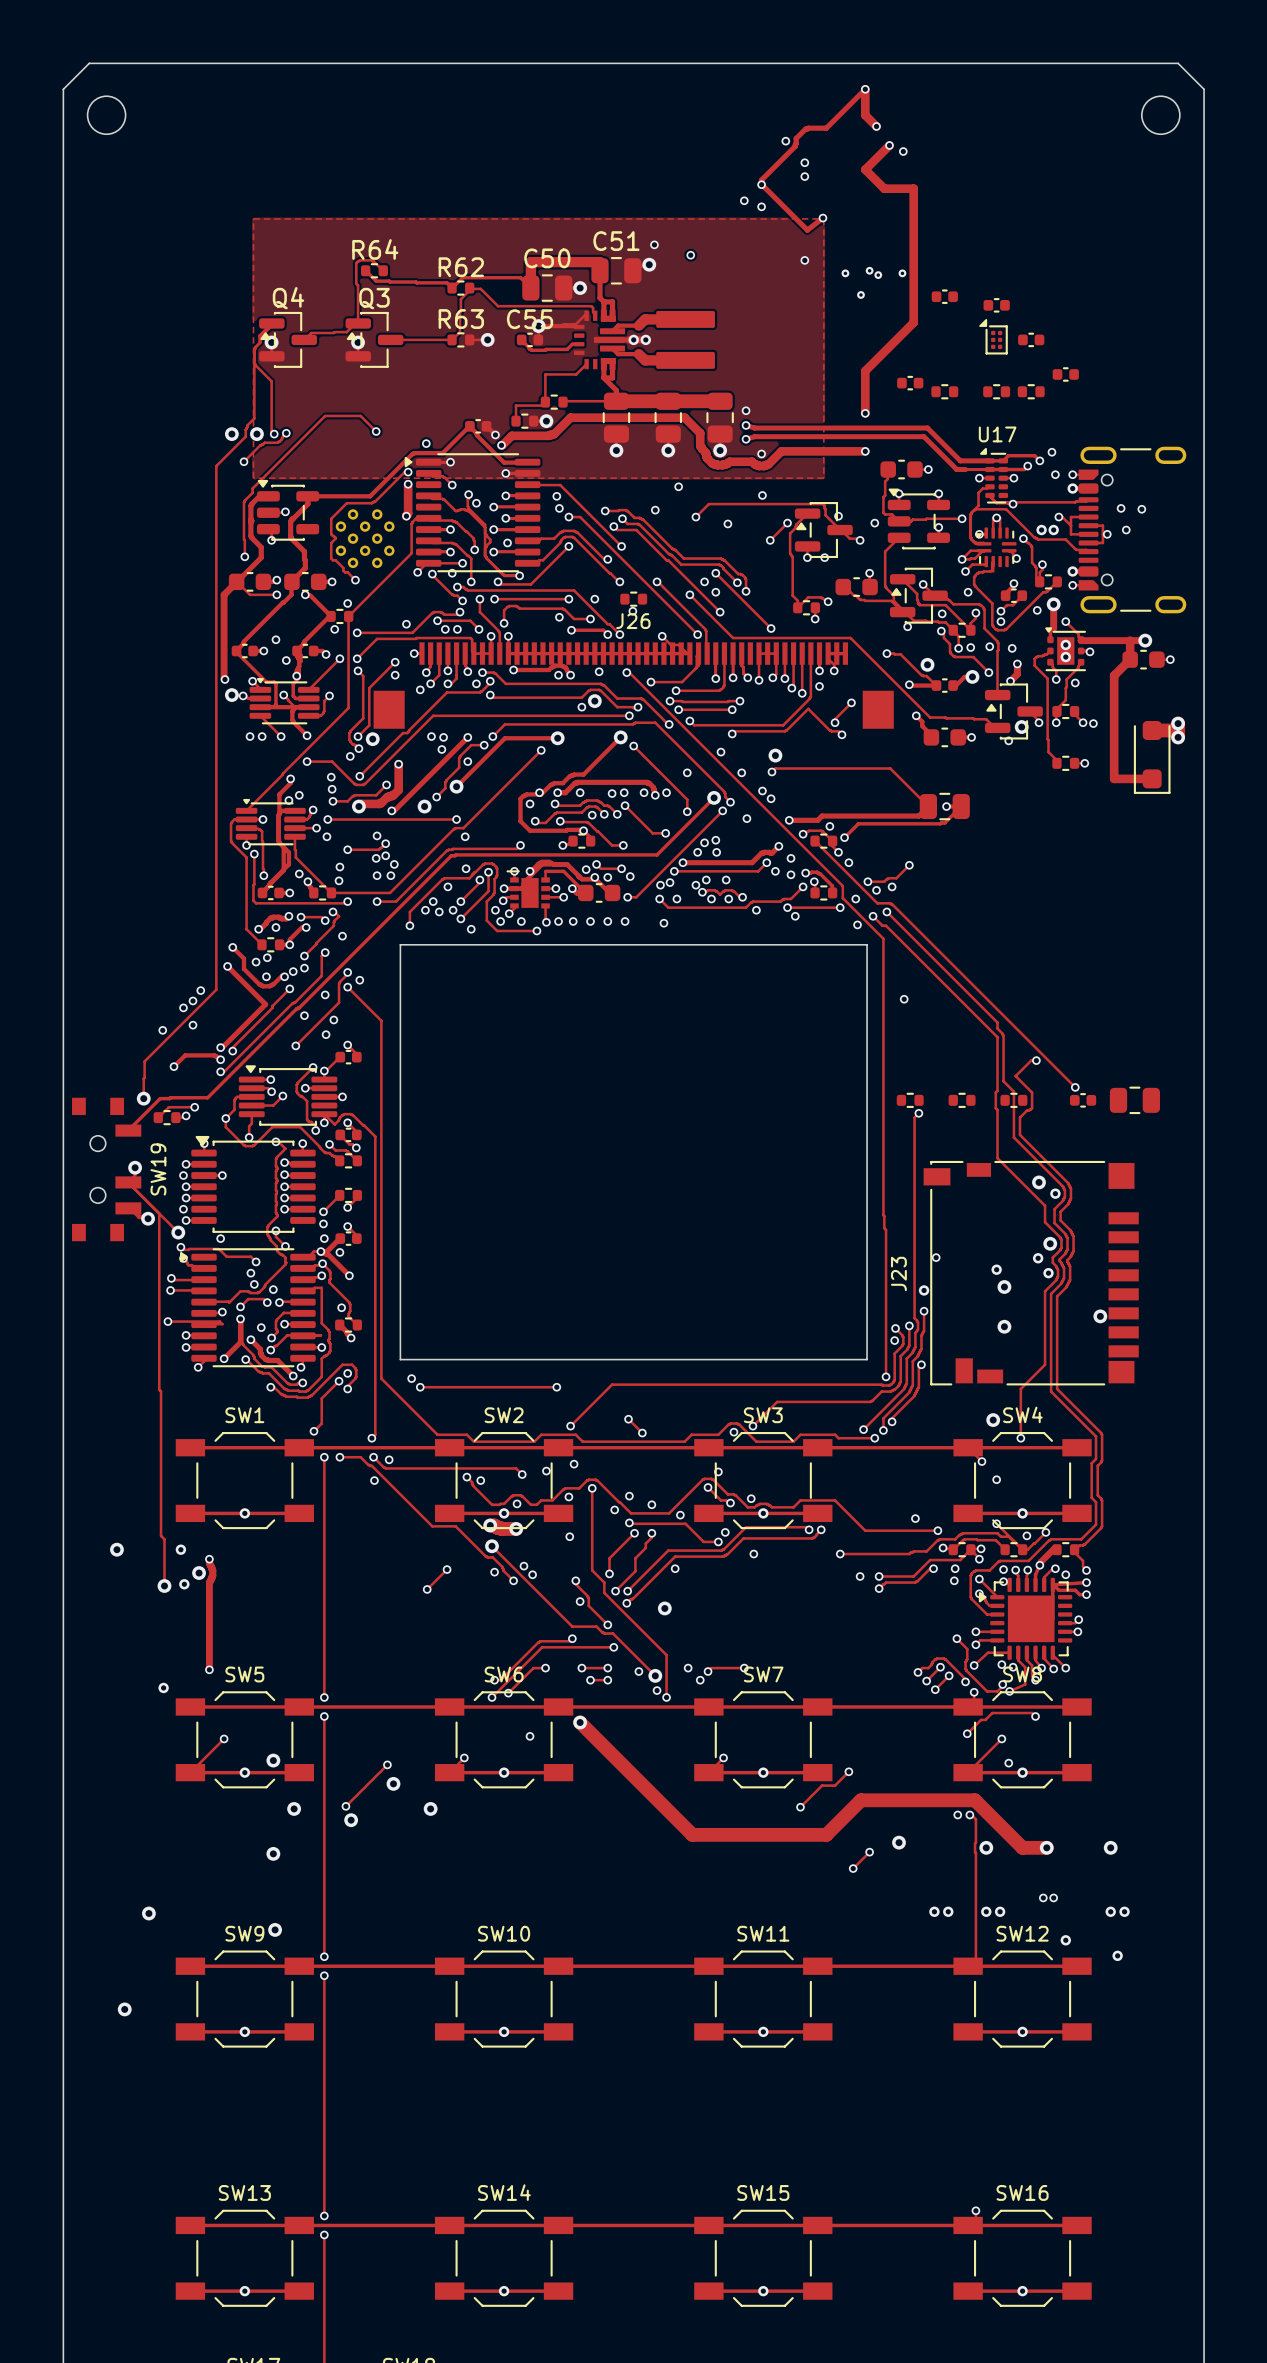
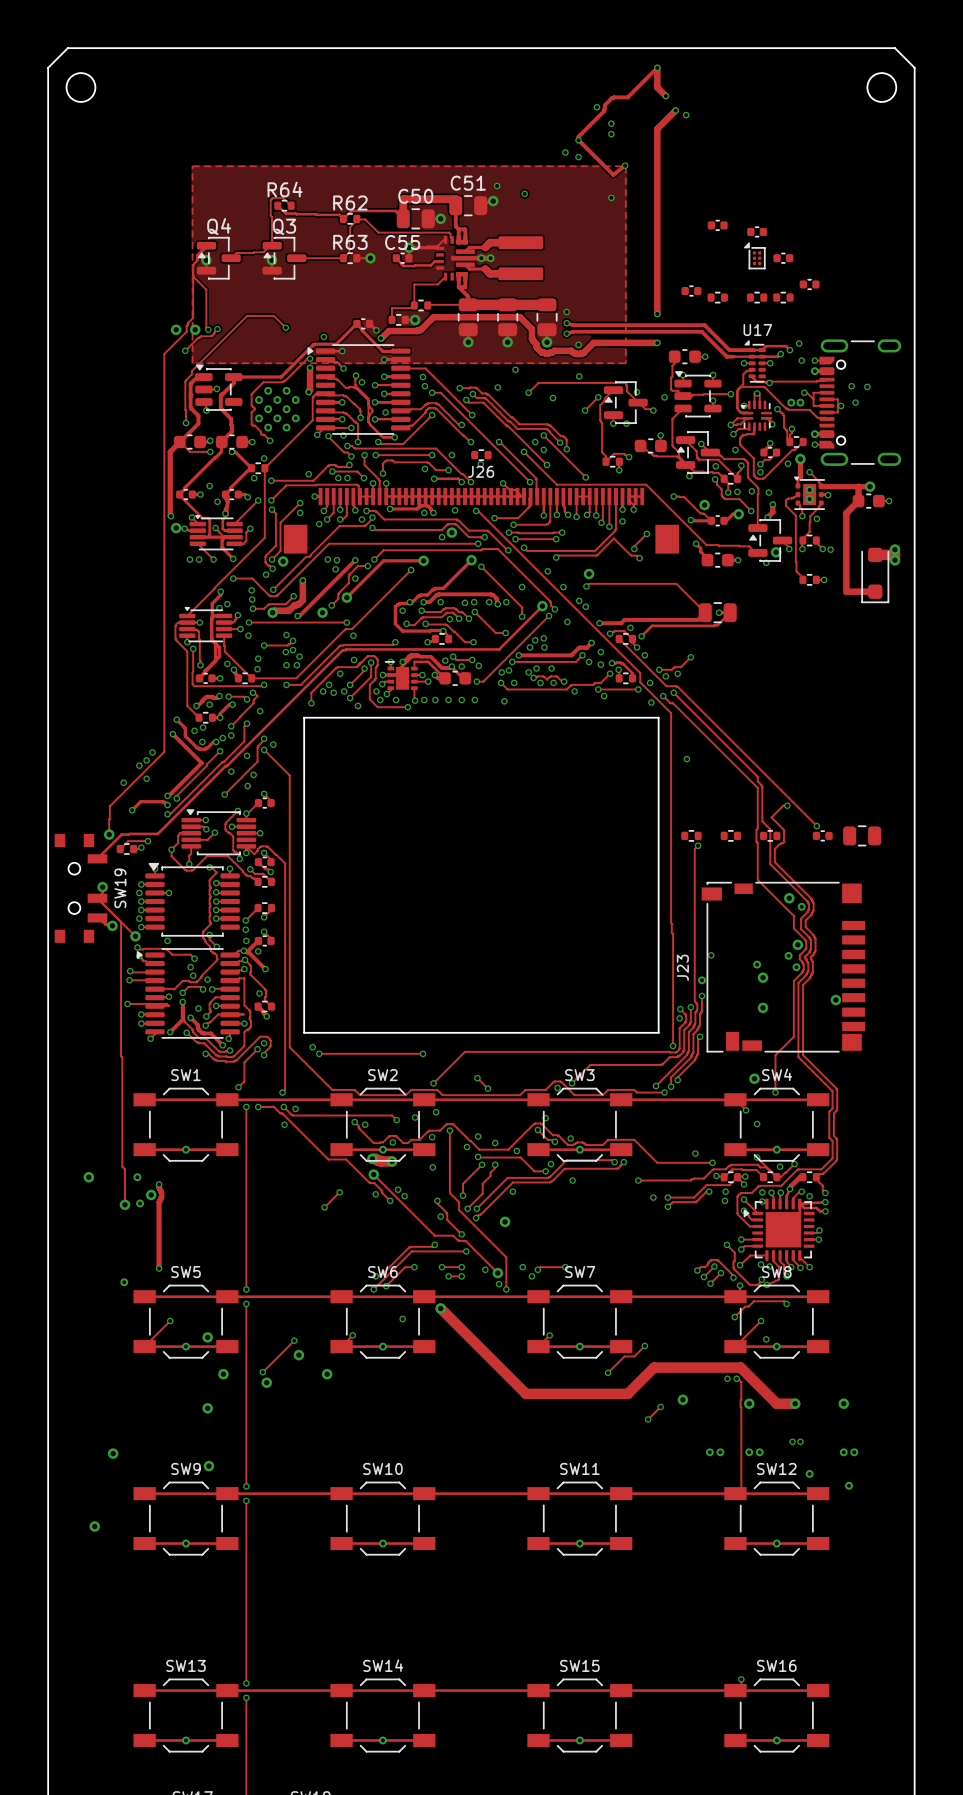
track: (865, 169) (884, 188) (913, 188) (913, 322) (865, 371) -> (657, 128) (657, 281)
via: (869, 270) -> none
via: (845, 273) -> none
via: (902, 273) -> none
via: (878, 275) -> none
via: (860, 294) -> none

